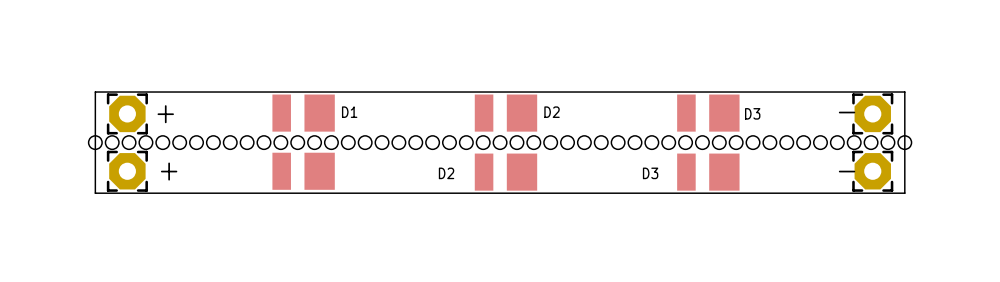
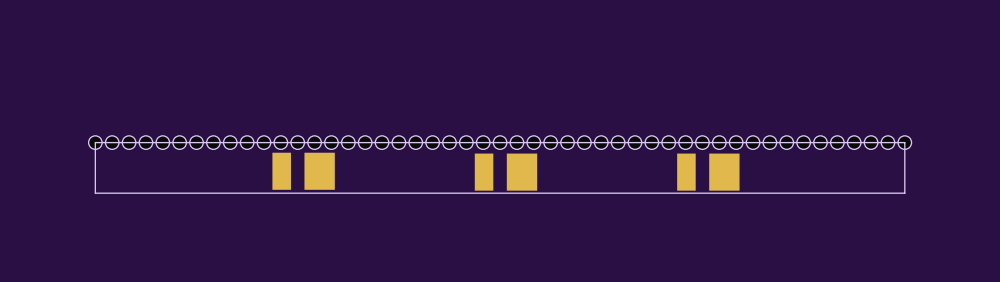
text: D1 (349, 112) -> none
text: D2 (552, 112) -> none
text: - (847, 112) -> none
part: (127, 113) -> none
part: (303, 113) -> none
part: (505, 113) -> none
part: (708, 113) -> none
text: D3 (752, 113) -> none
part: (872, 113) -> none
text: + (165, 114) -> none
board edge: (95, 142) (95, 92) (904, 92) (904, 142) -> (95, 142) (904, 142)
part: (127, 171) -> none
part: (872, 171) -> none
D2 name: D2 (446, 173) -> none
D3 name: D3 (650, 173) -> none

